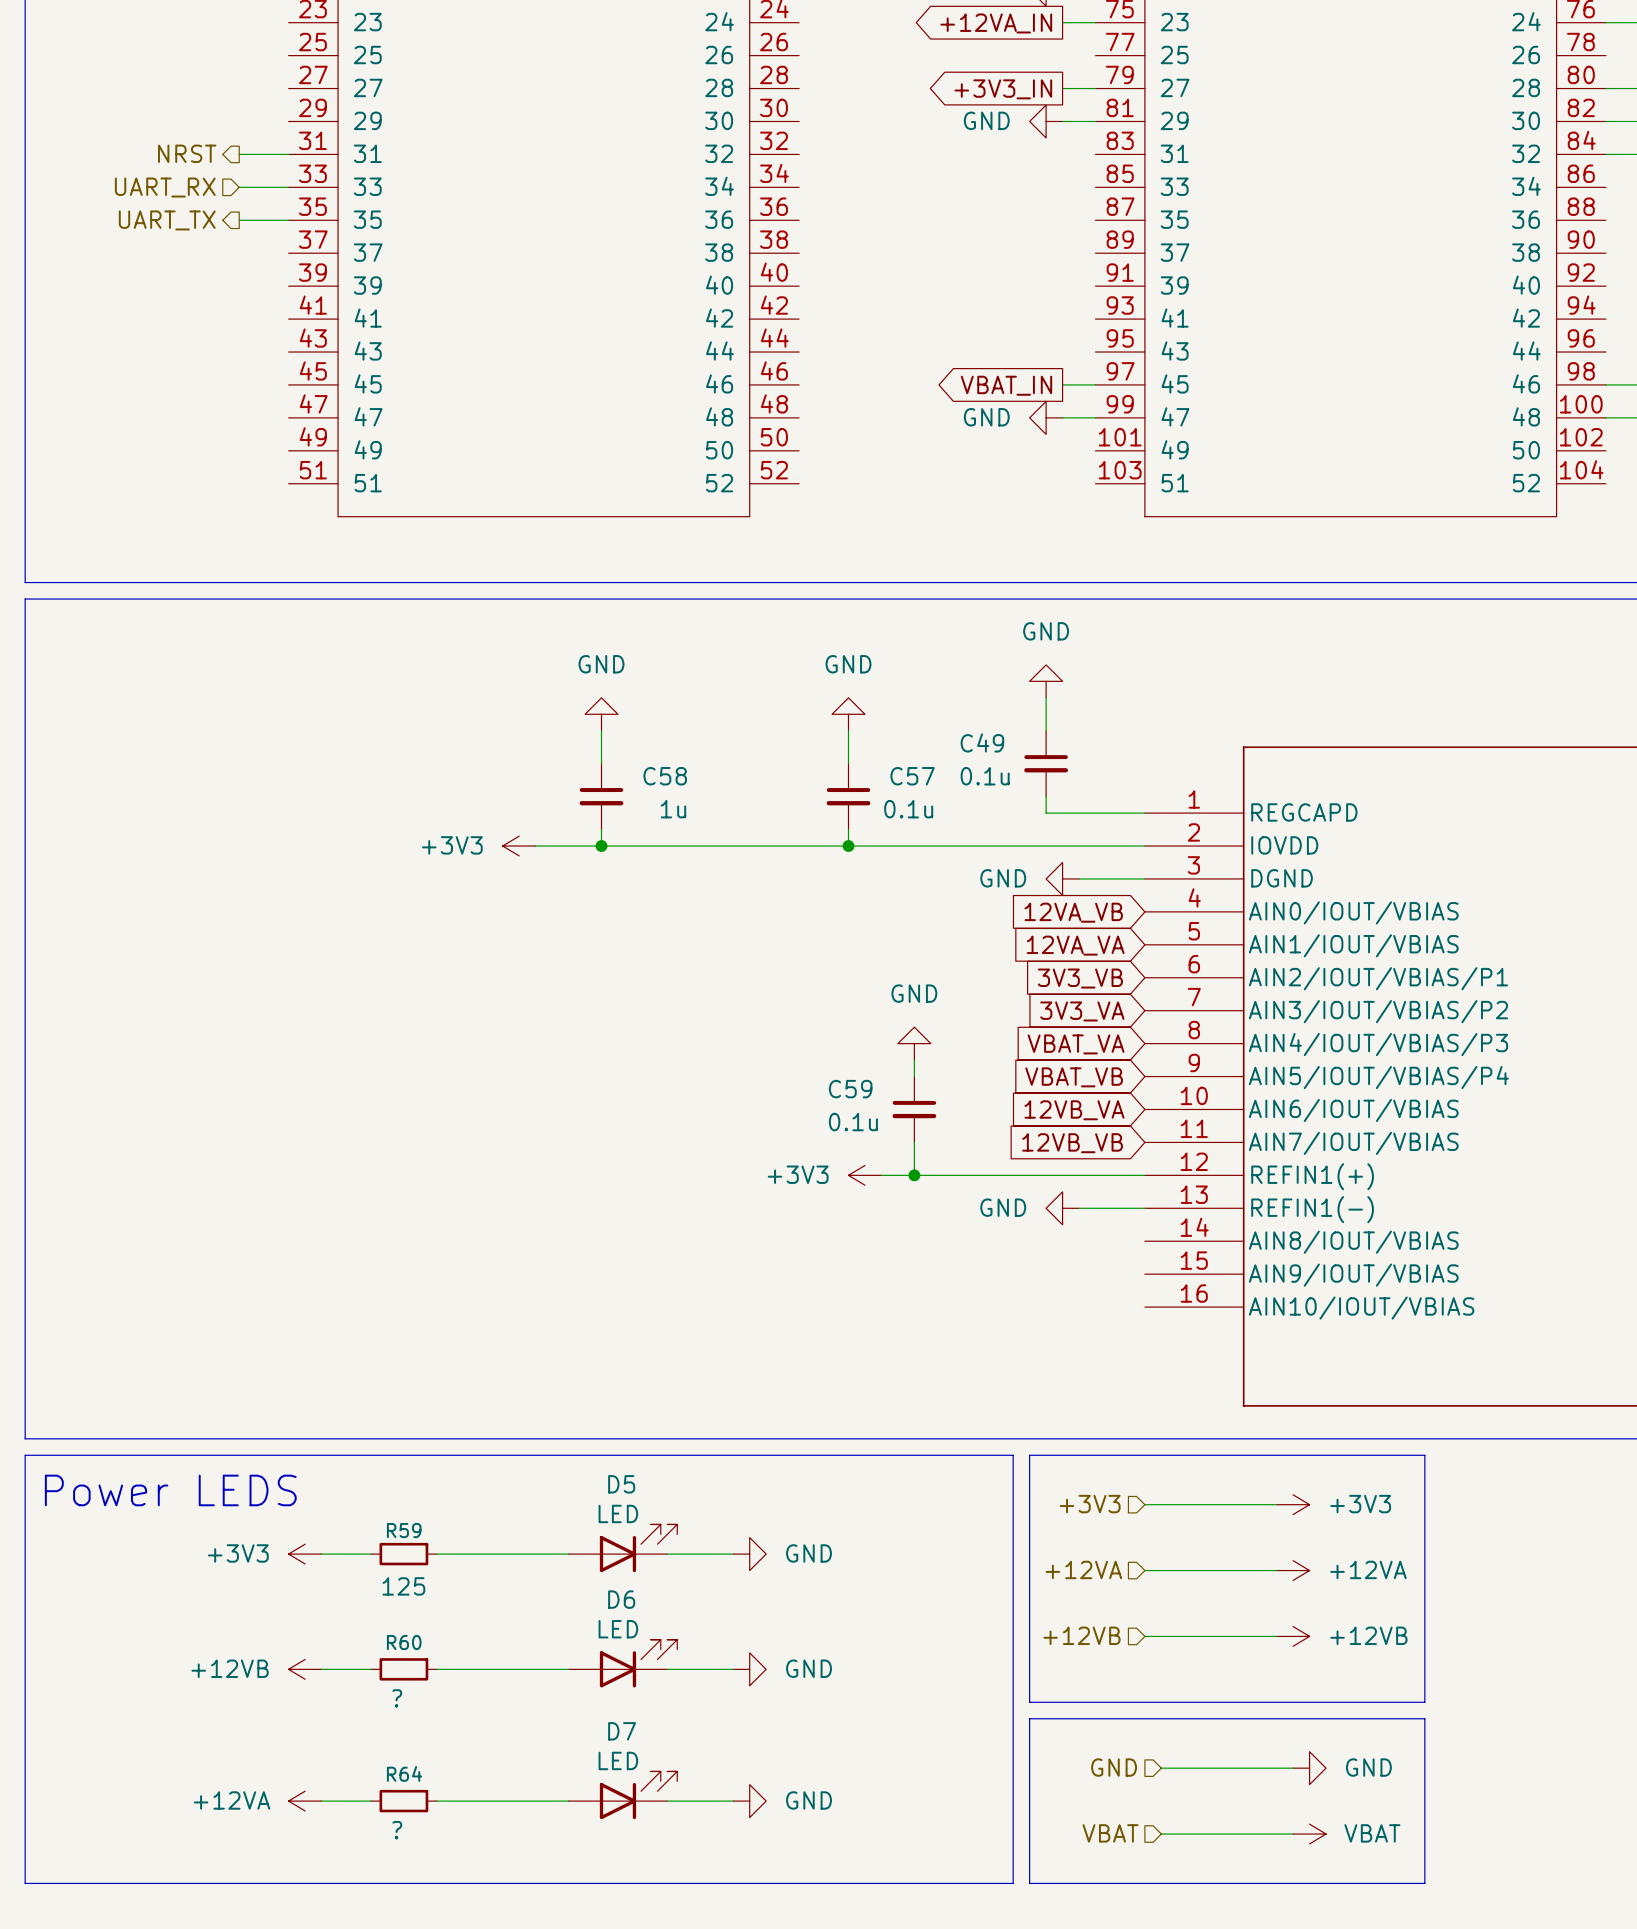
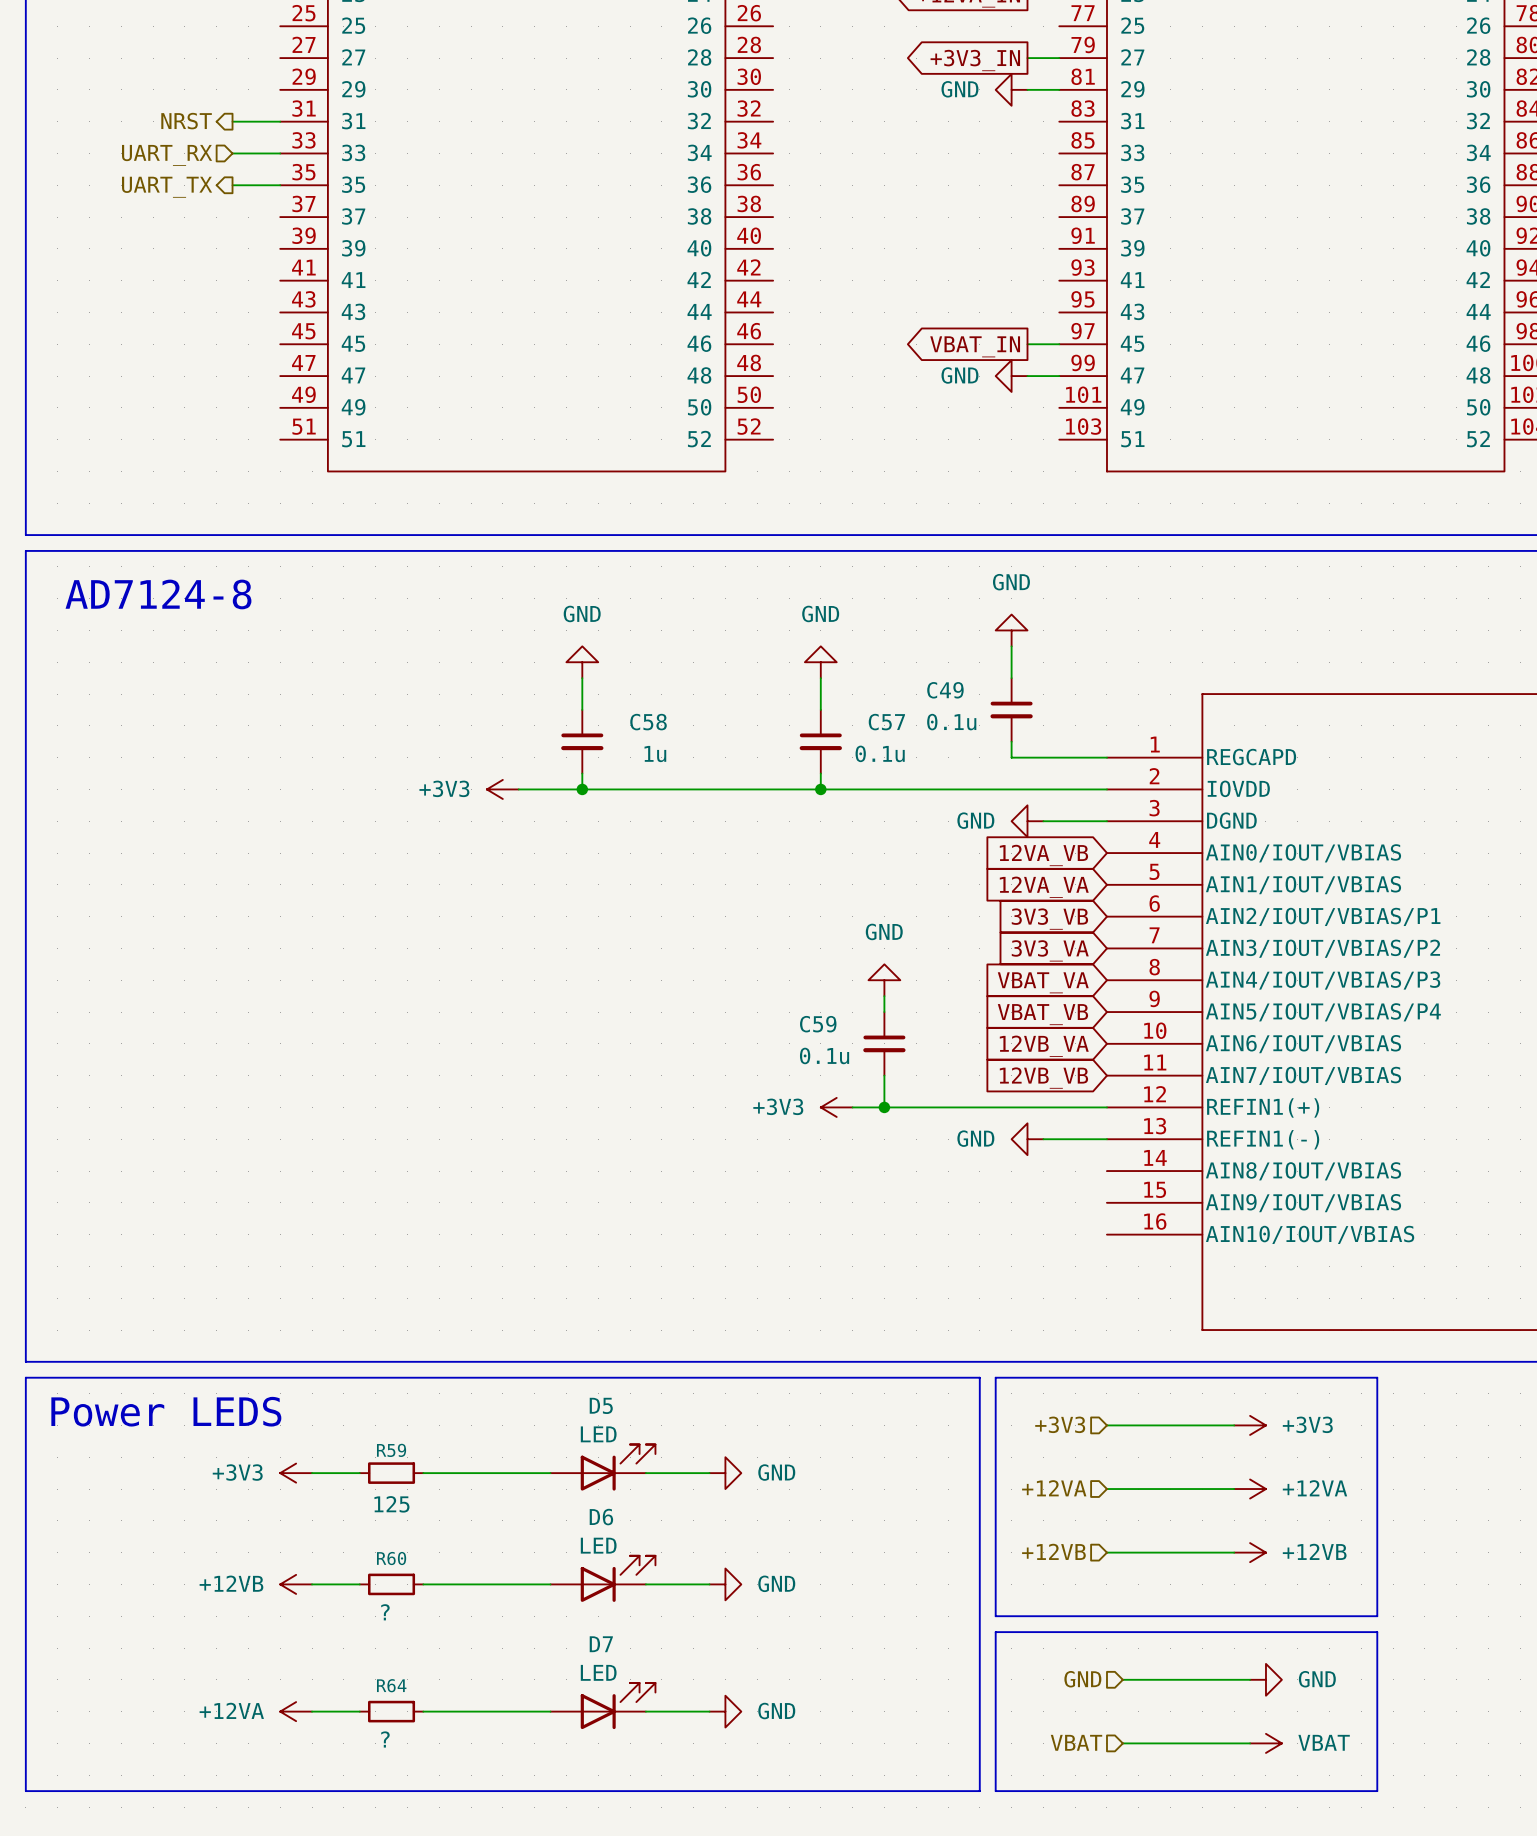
text: none -> AD7124-8 (158, 594)

